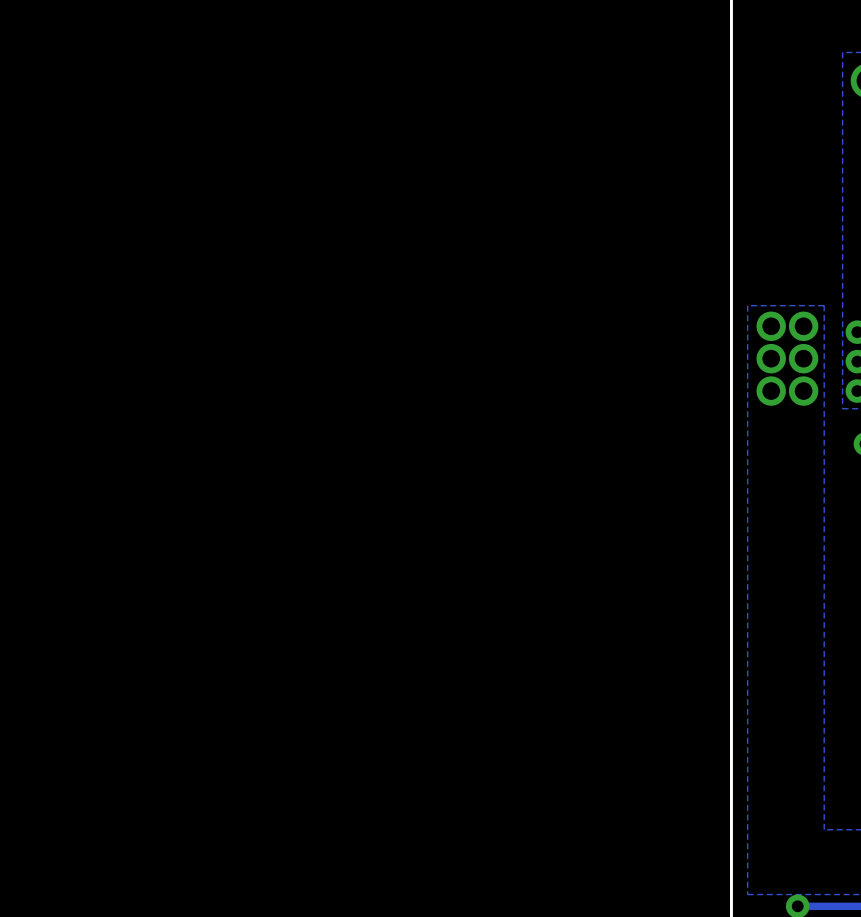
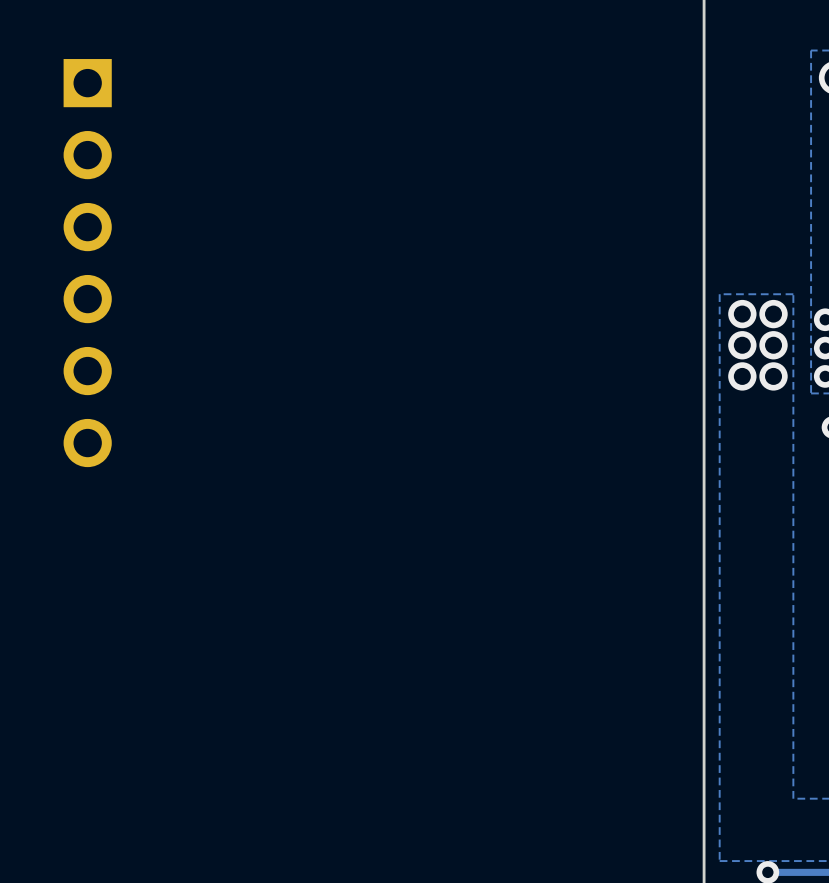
part: none -> (87, 263)

